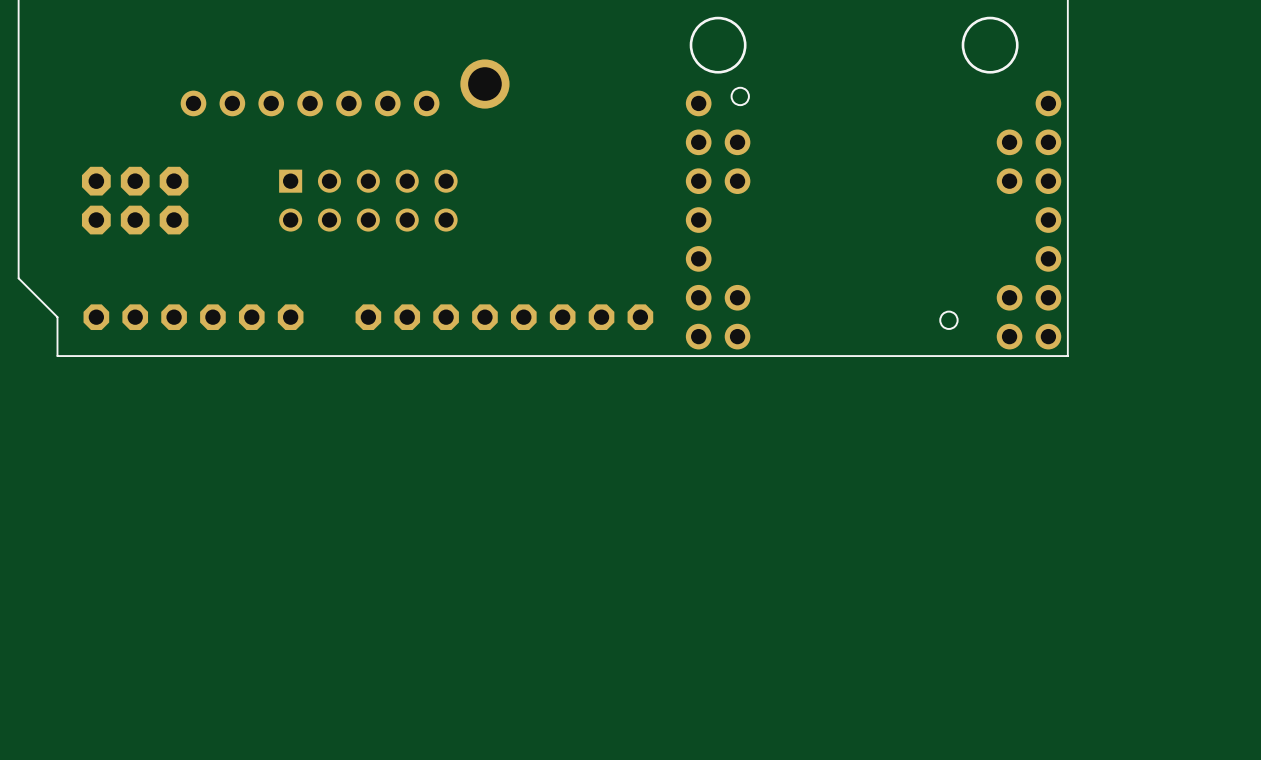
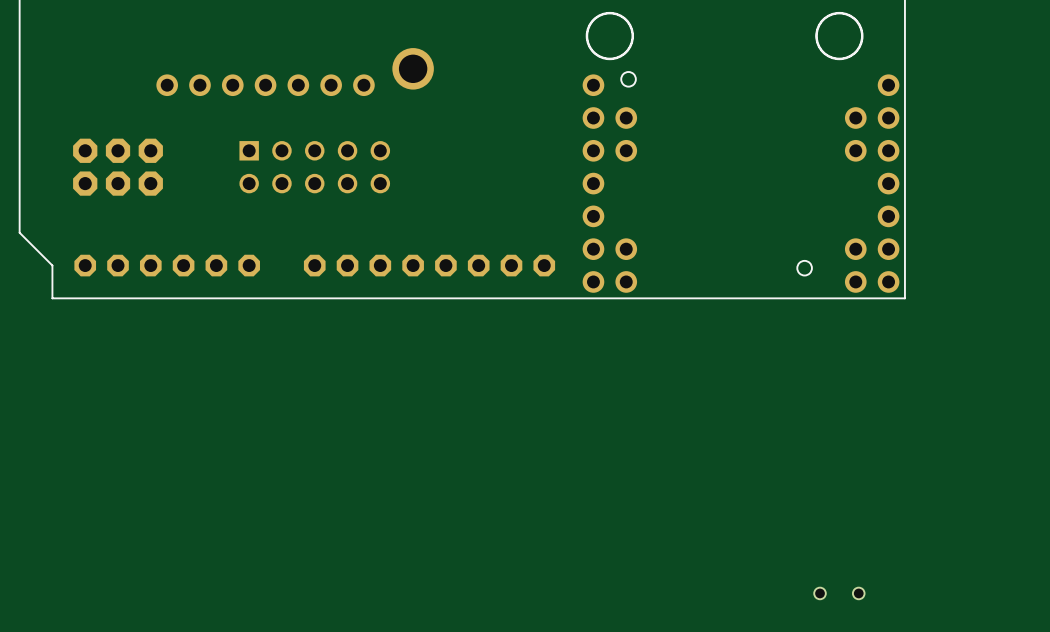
part: none -> (839, 593)

